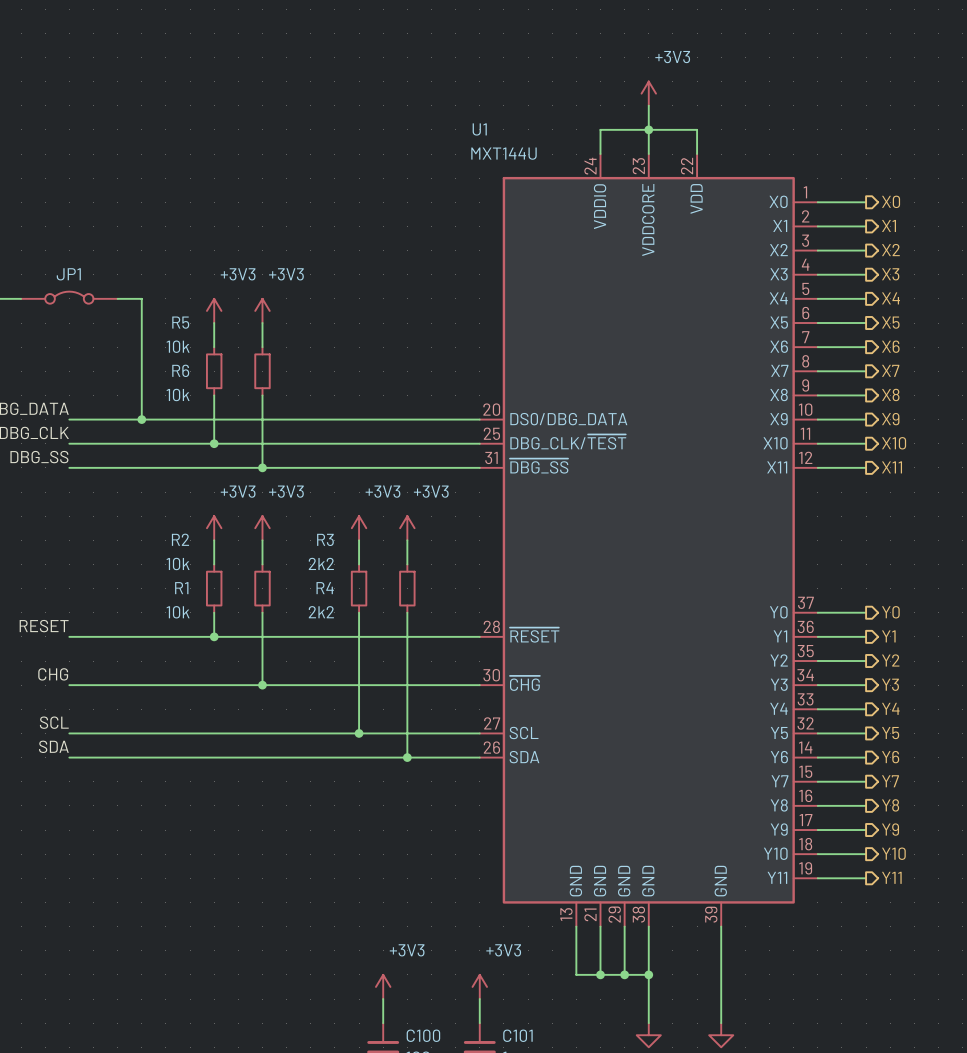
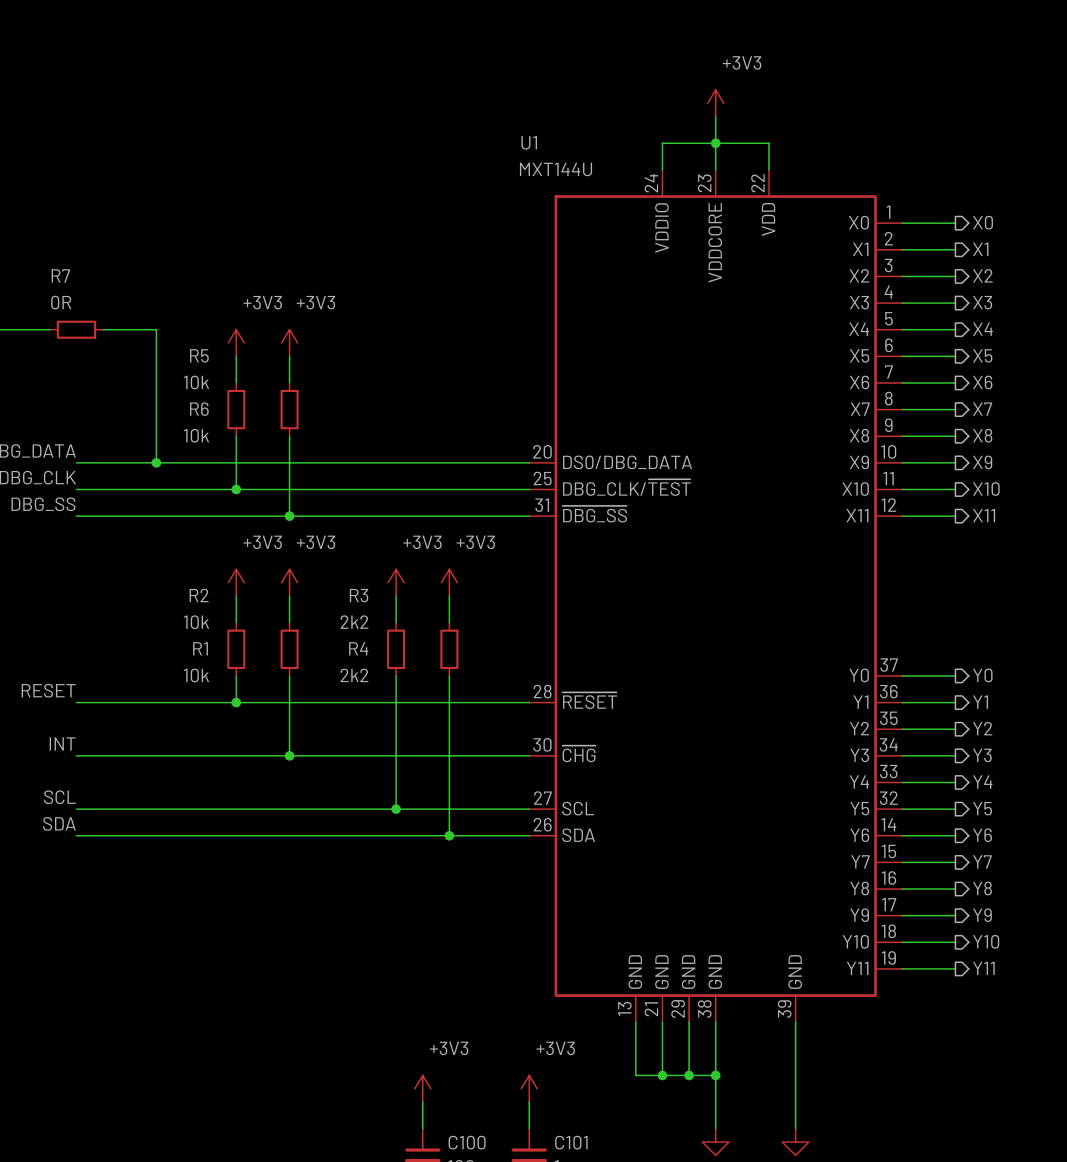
JP1: (69, 297) -> none
R7: none -> 0R (76, 329)
label: CHG (53, 674) -> INT (62, 743)

